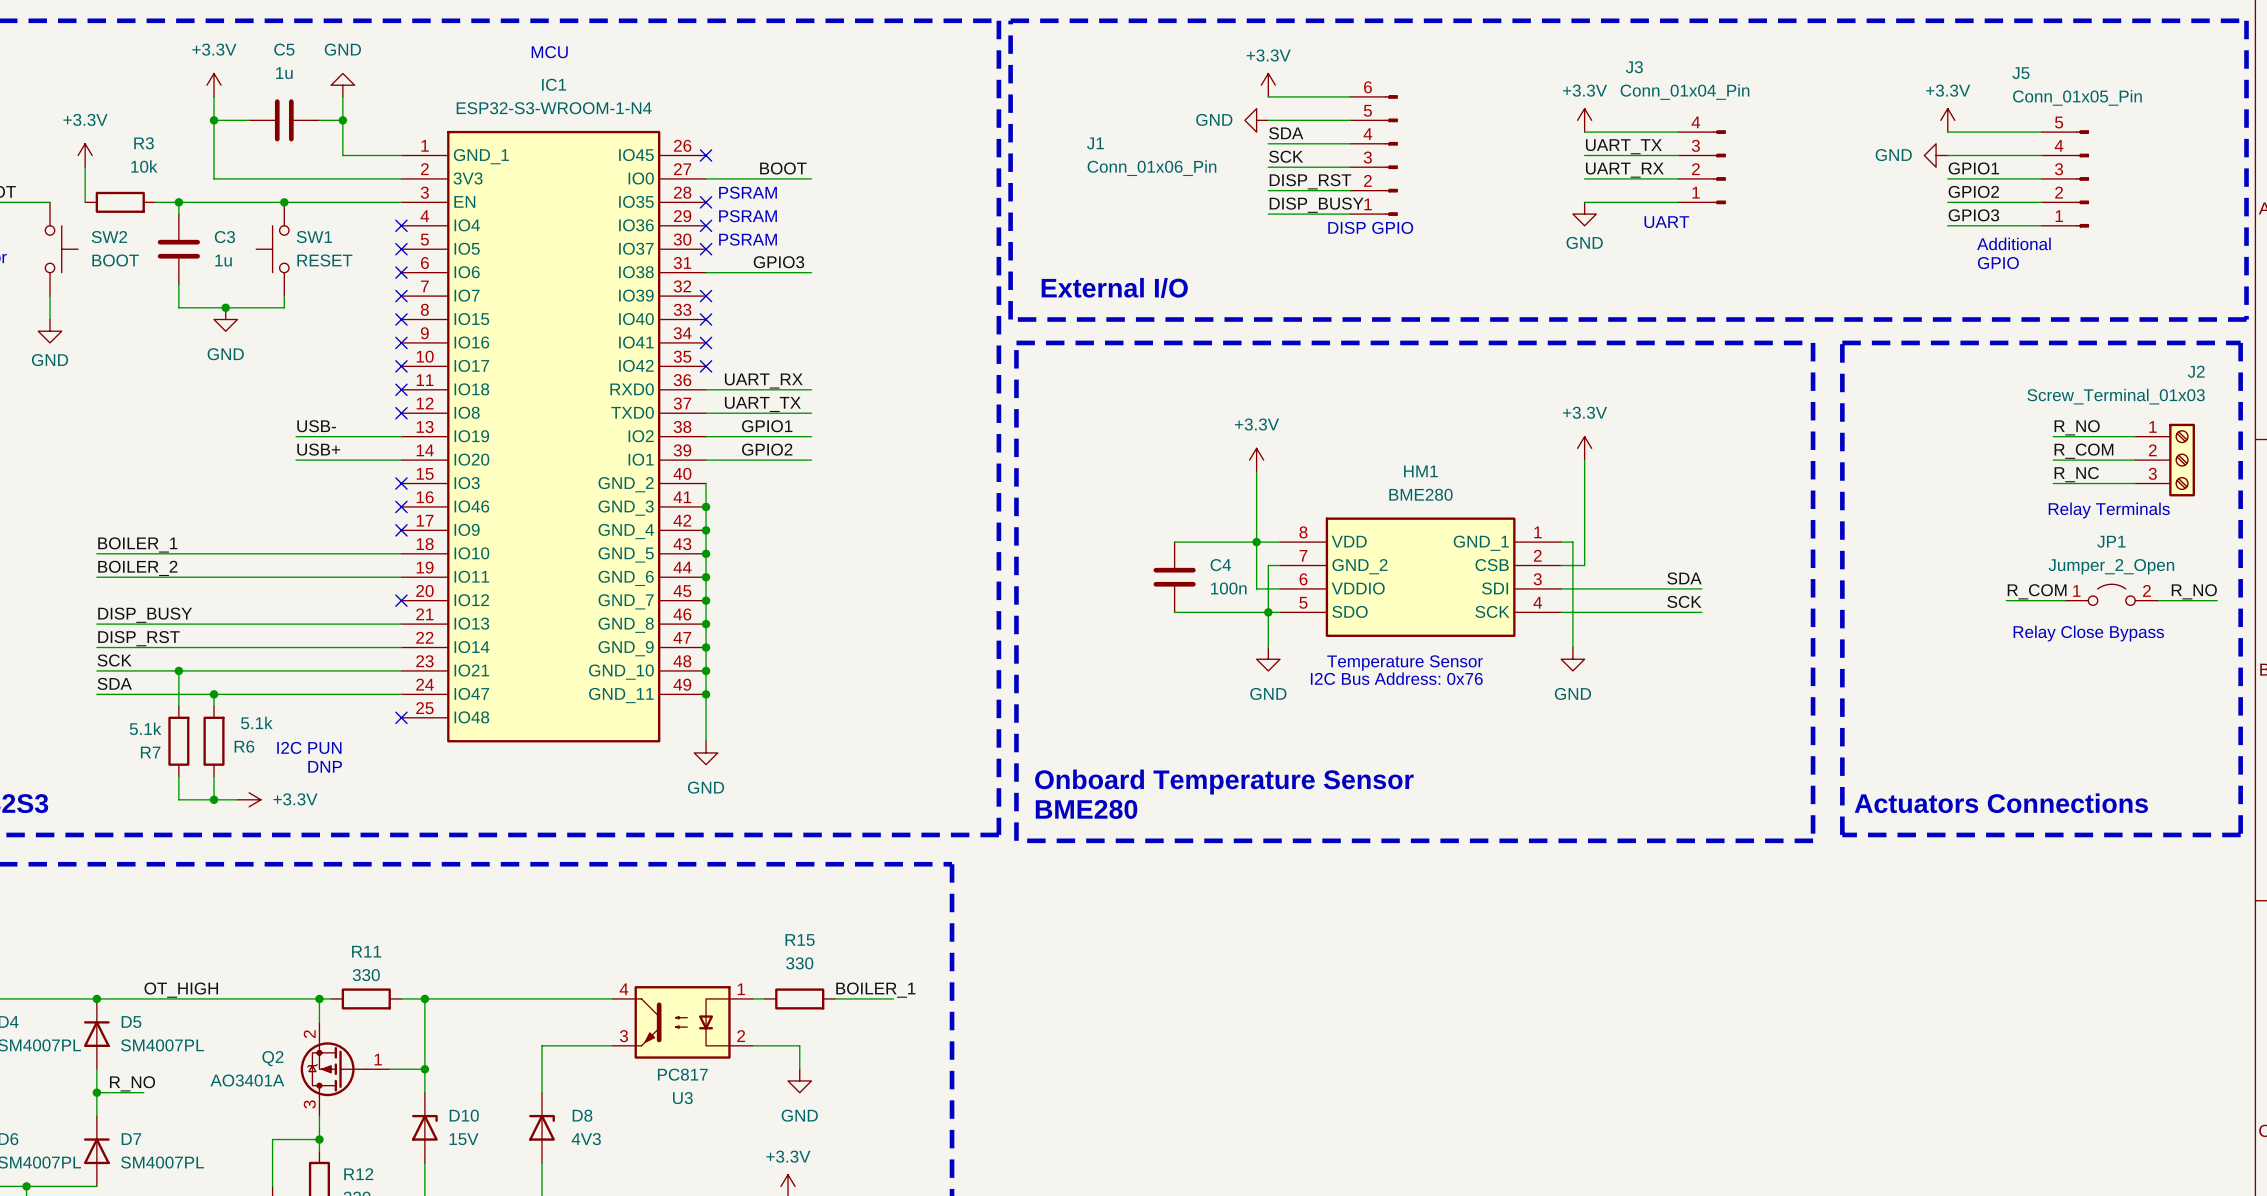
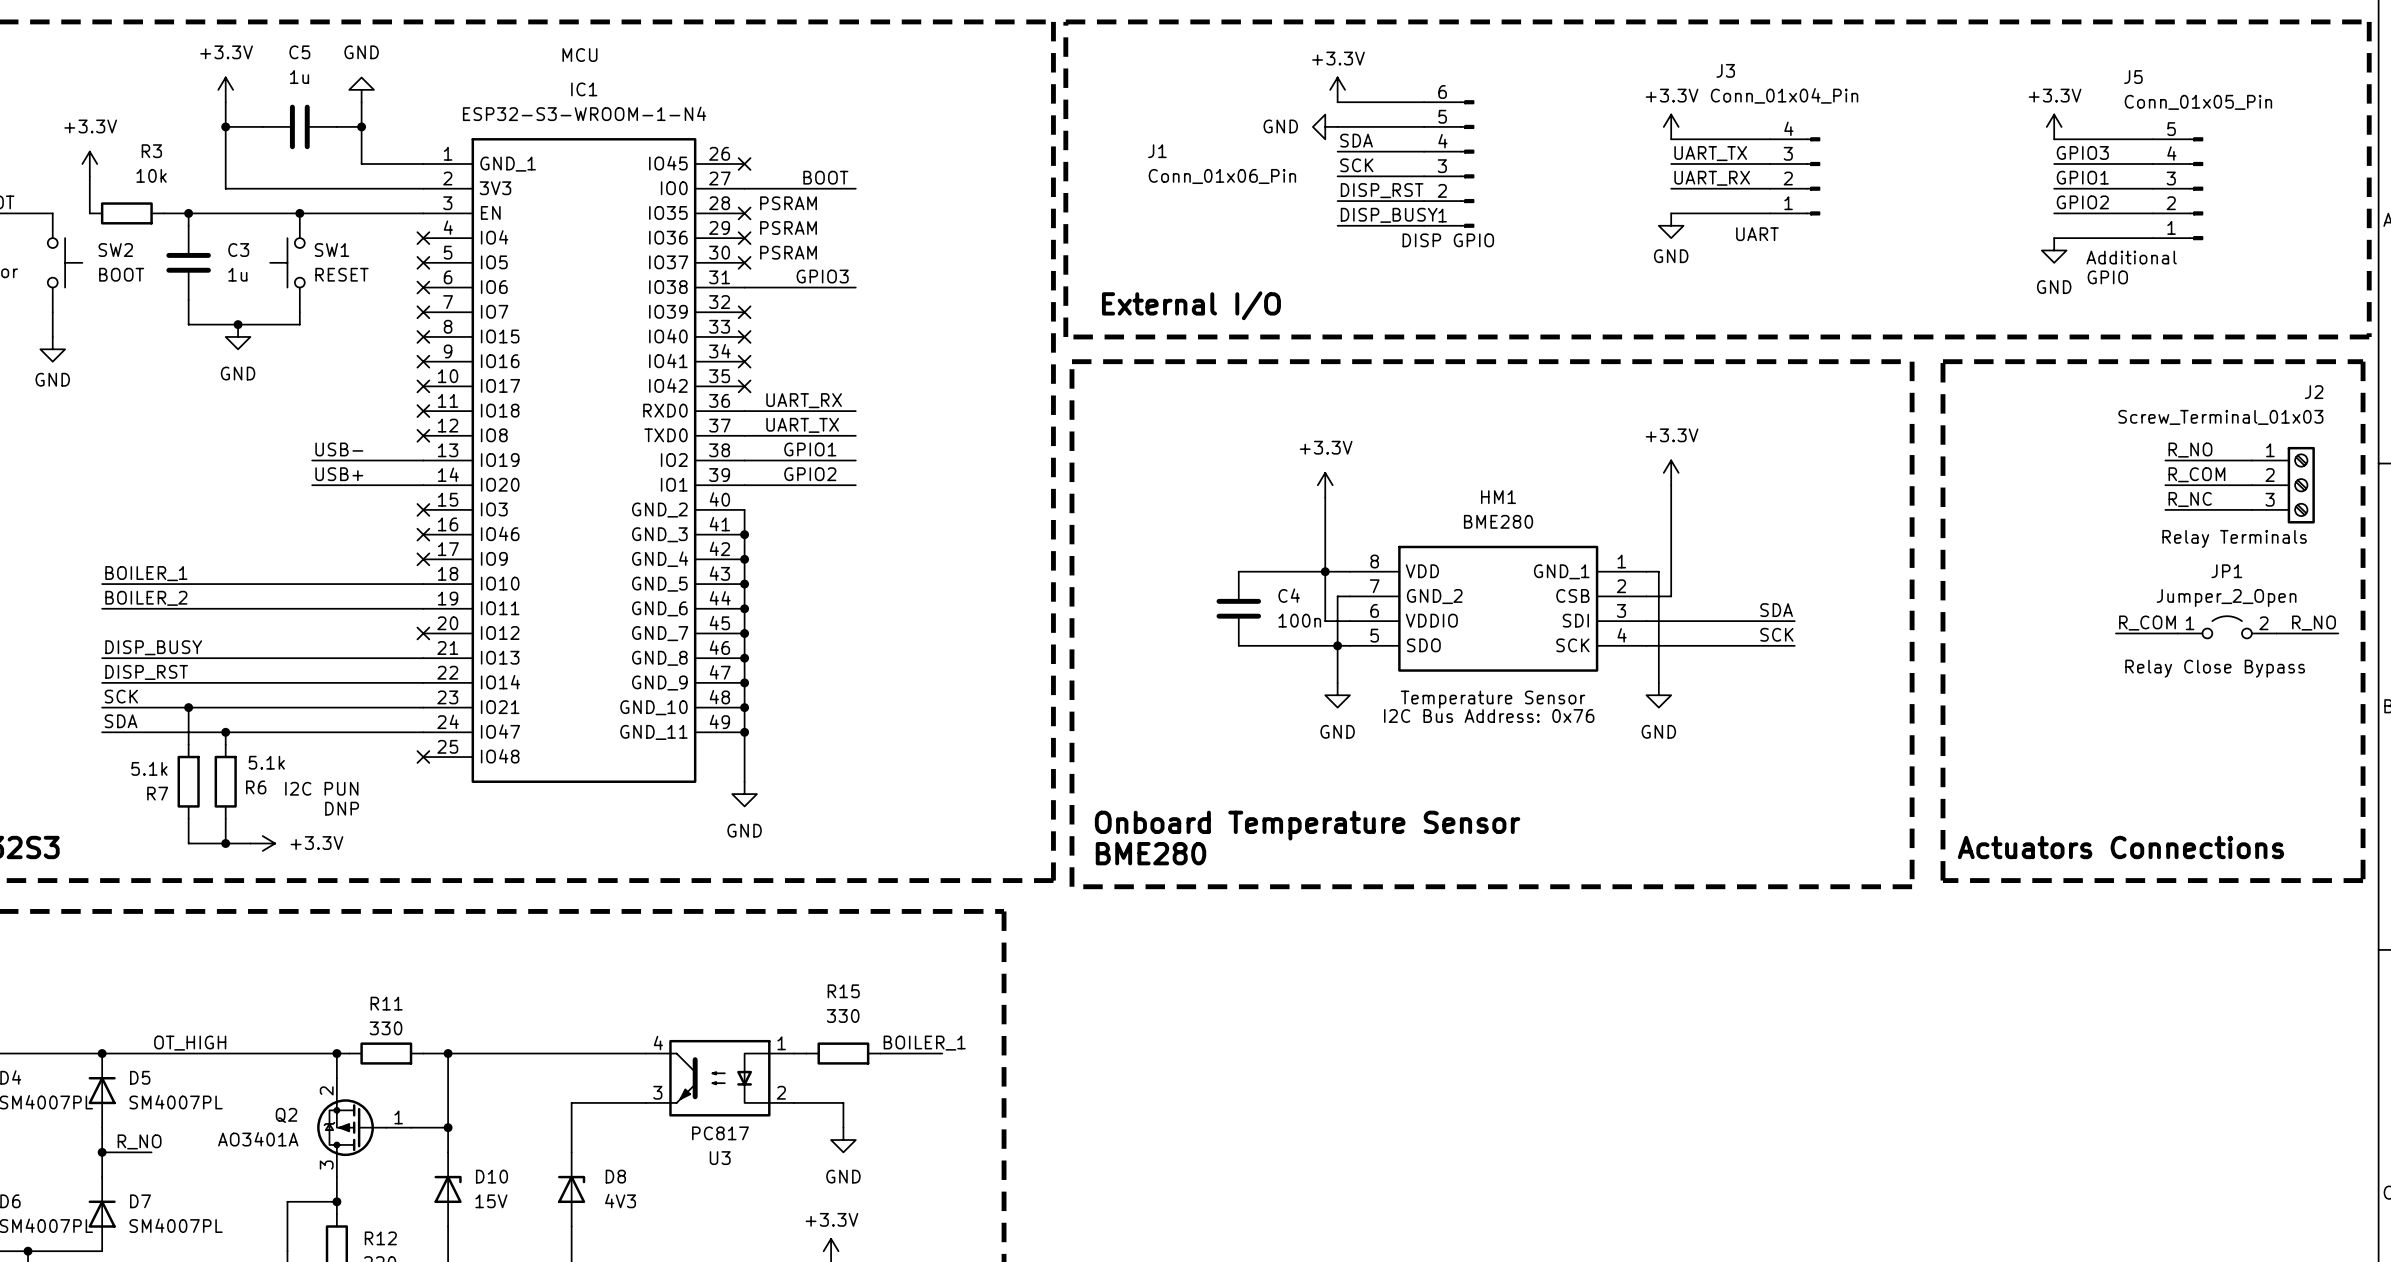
power symbol rotation: 0° (1936, 155) -> 90° counterclockwise (2054, 250)
power symbol position: GND (1936, 155) -> GND (2054, 250)
label position: GPIO3 (1973, 215) -> GPIO3 (2082, 152)

